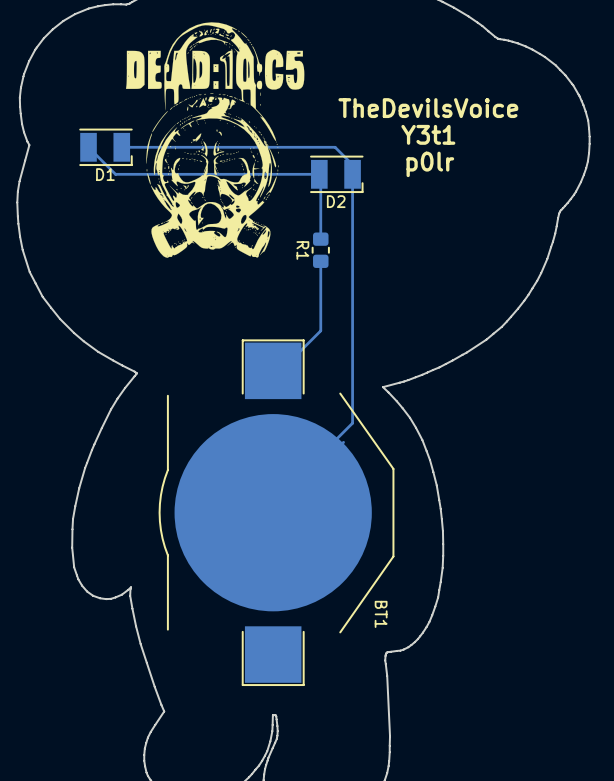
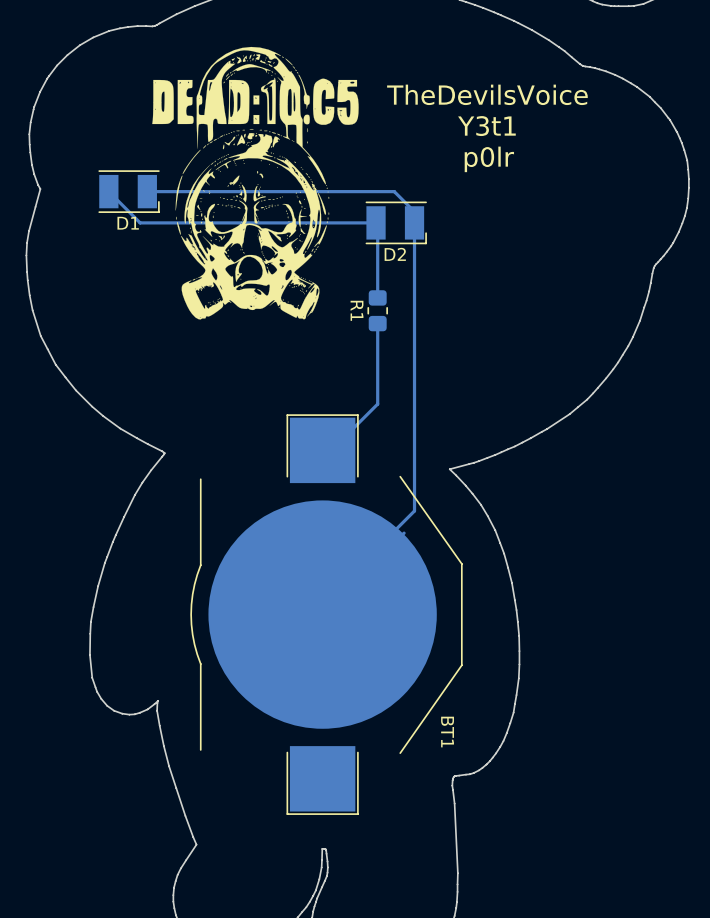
text position: TheDevilsVoice (428, 108) -> TheDevilsVoice (487, 94)
text position: Y3t1 (428, 134) -> Y3t1 (486, 126)
text position: p0lr (430, 164) -> p0lr (489, 159)

